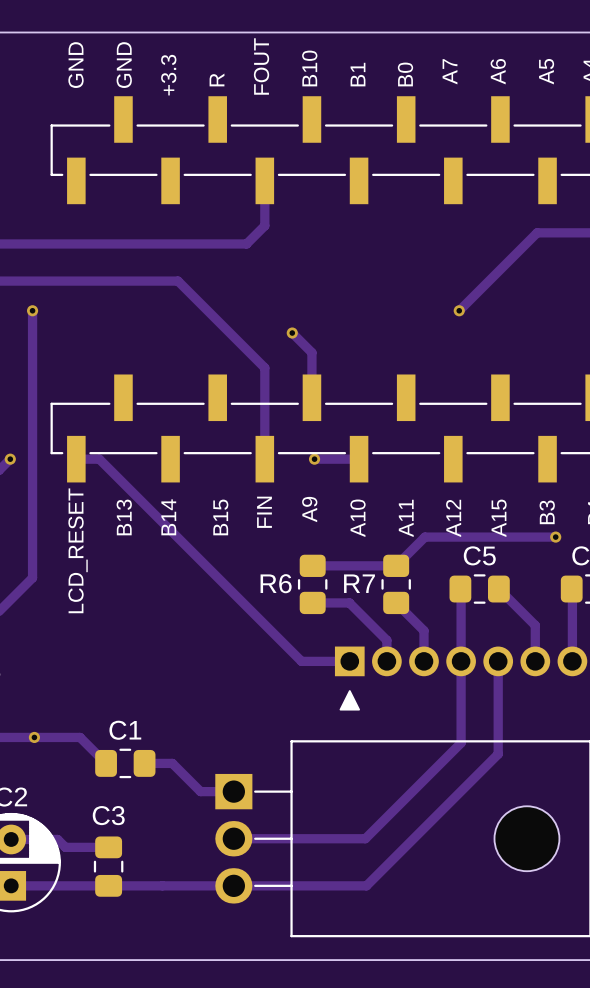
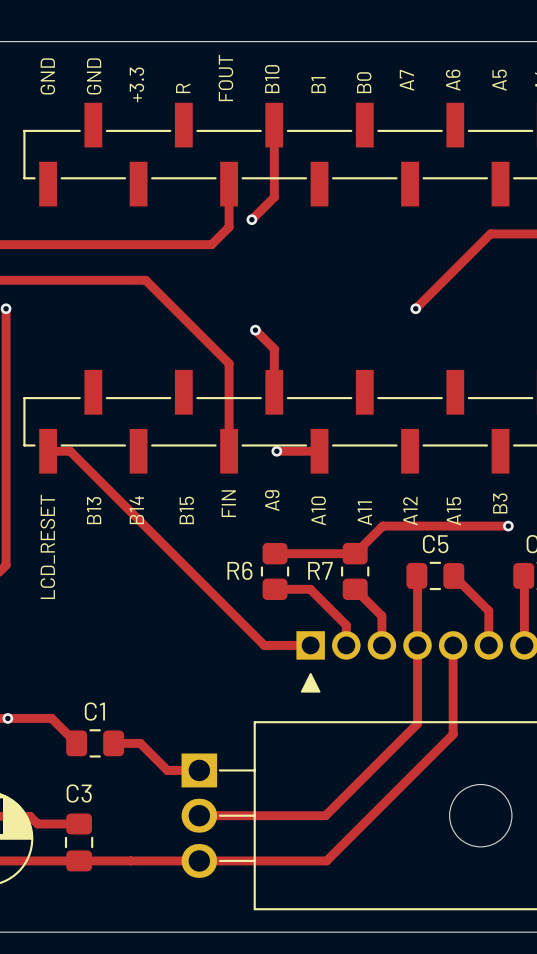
track: none -> (274, 125) (274, 197) (251, 219)
via: none -> (251, 219)

